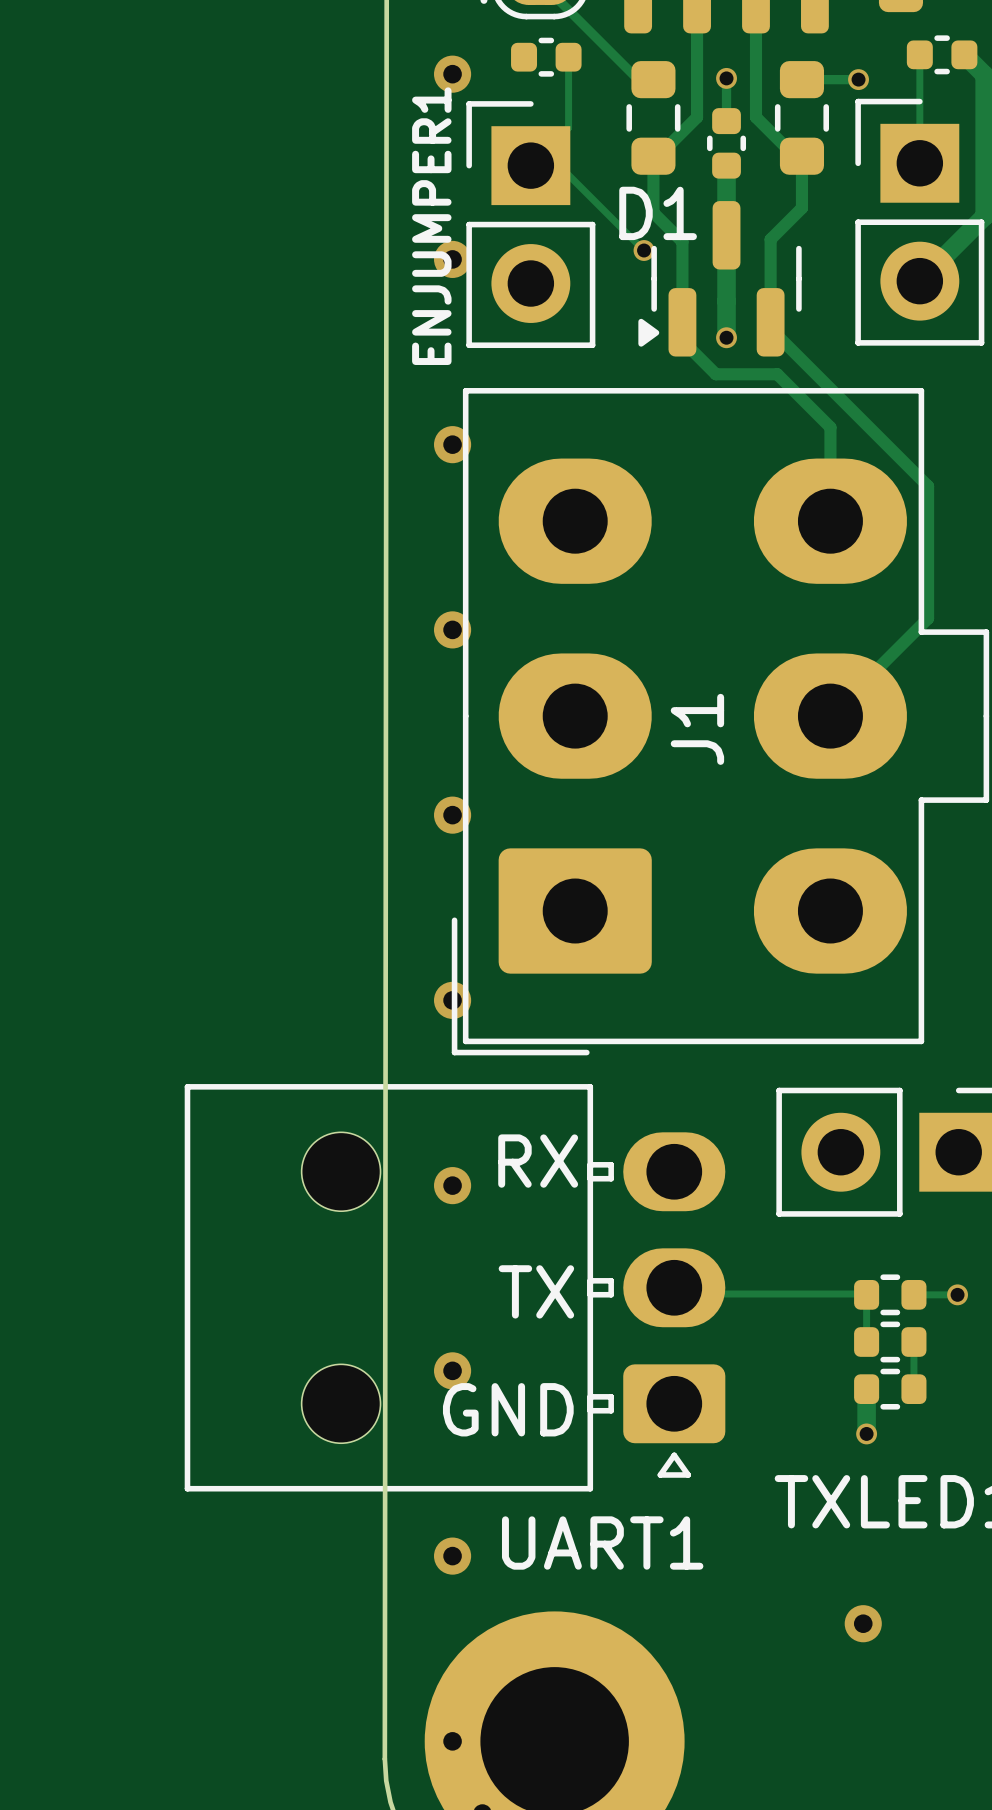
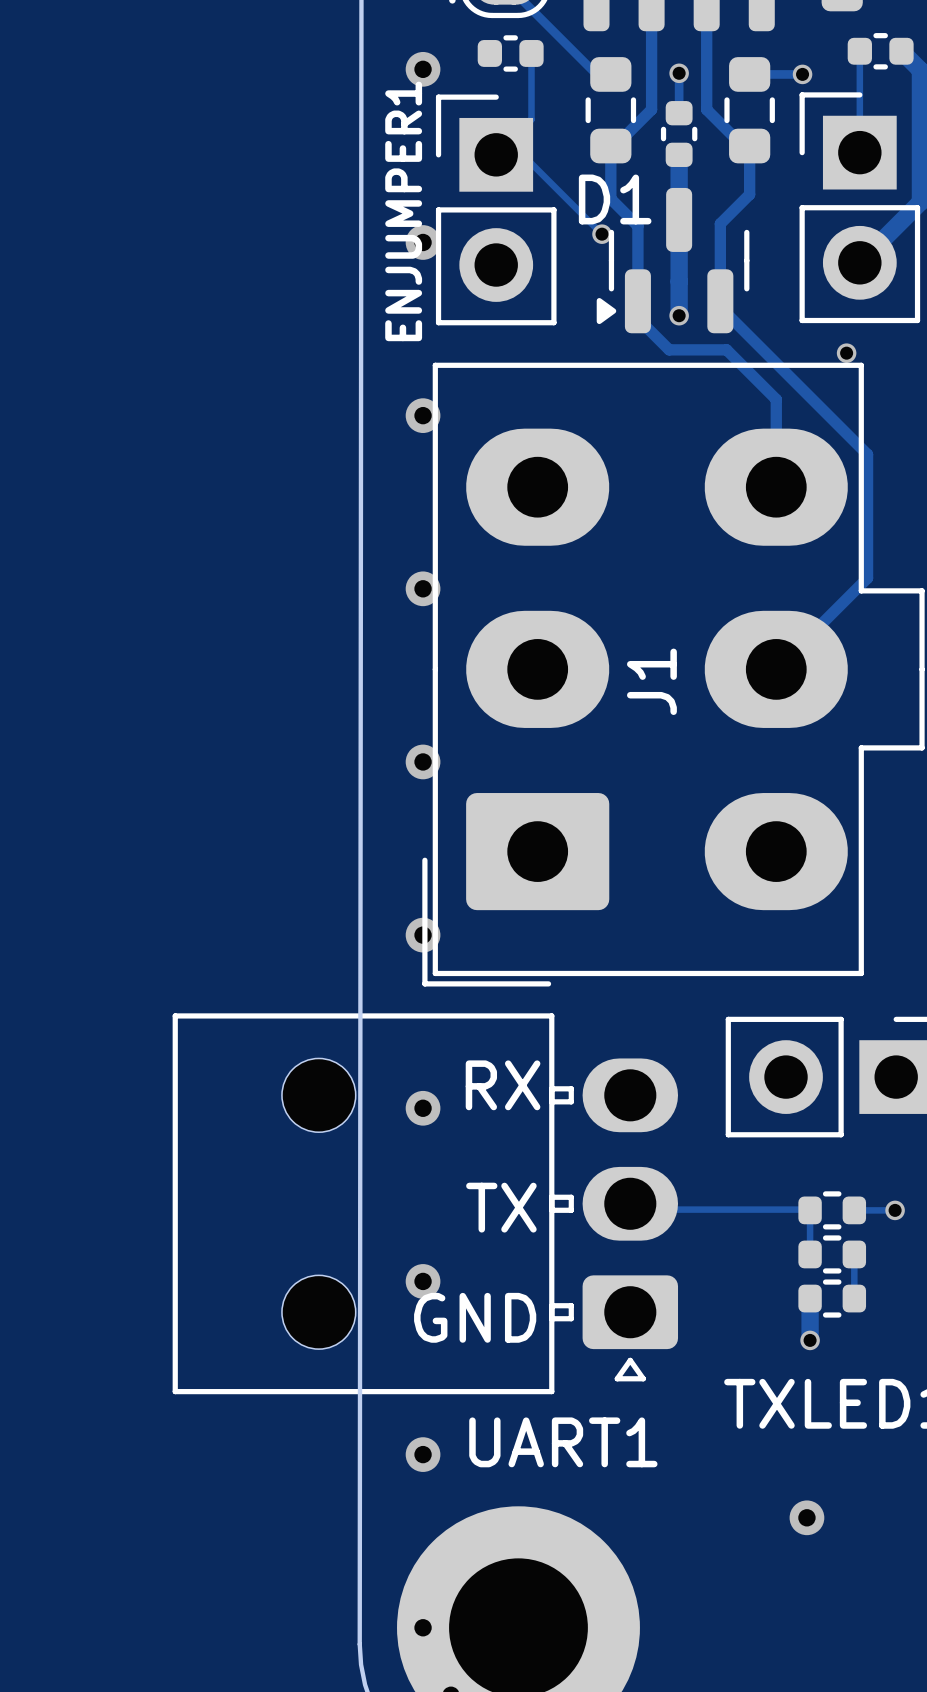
via: none -> (846, 353)

